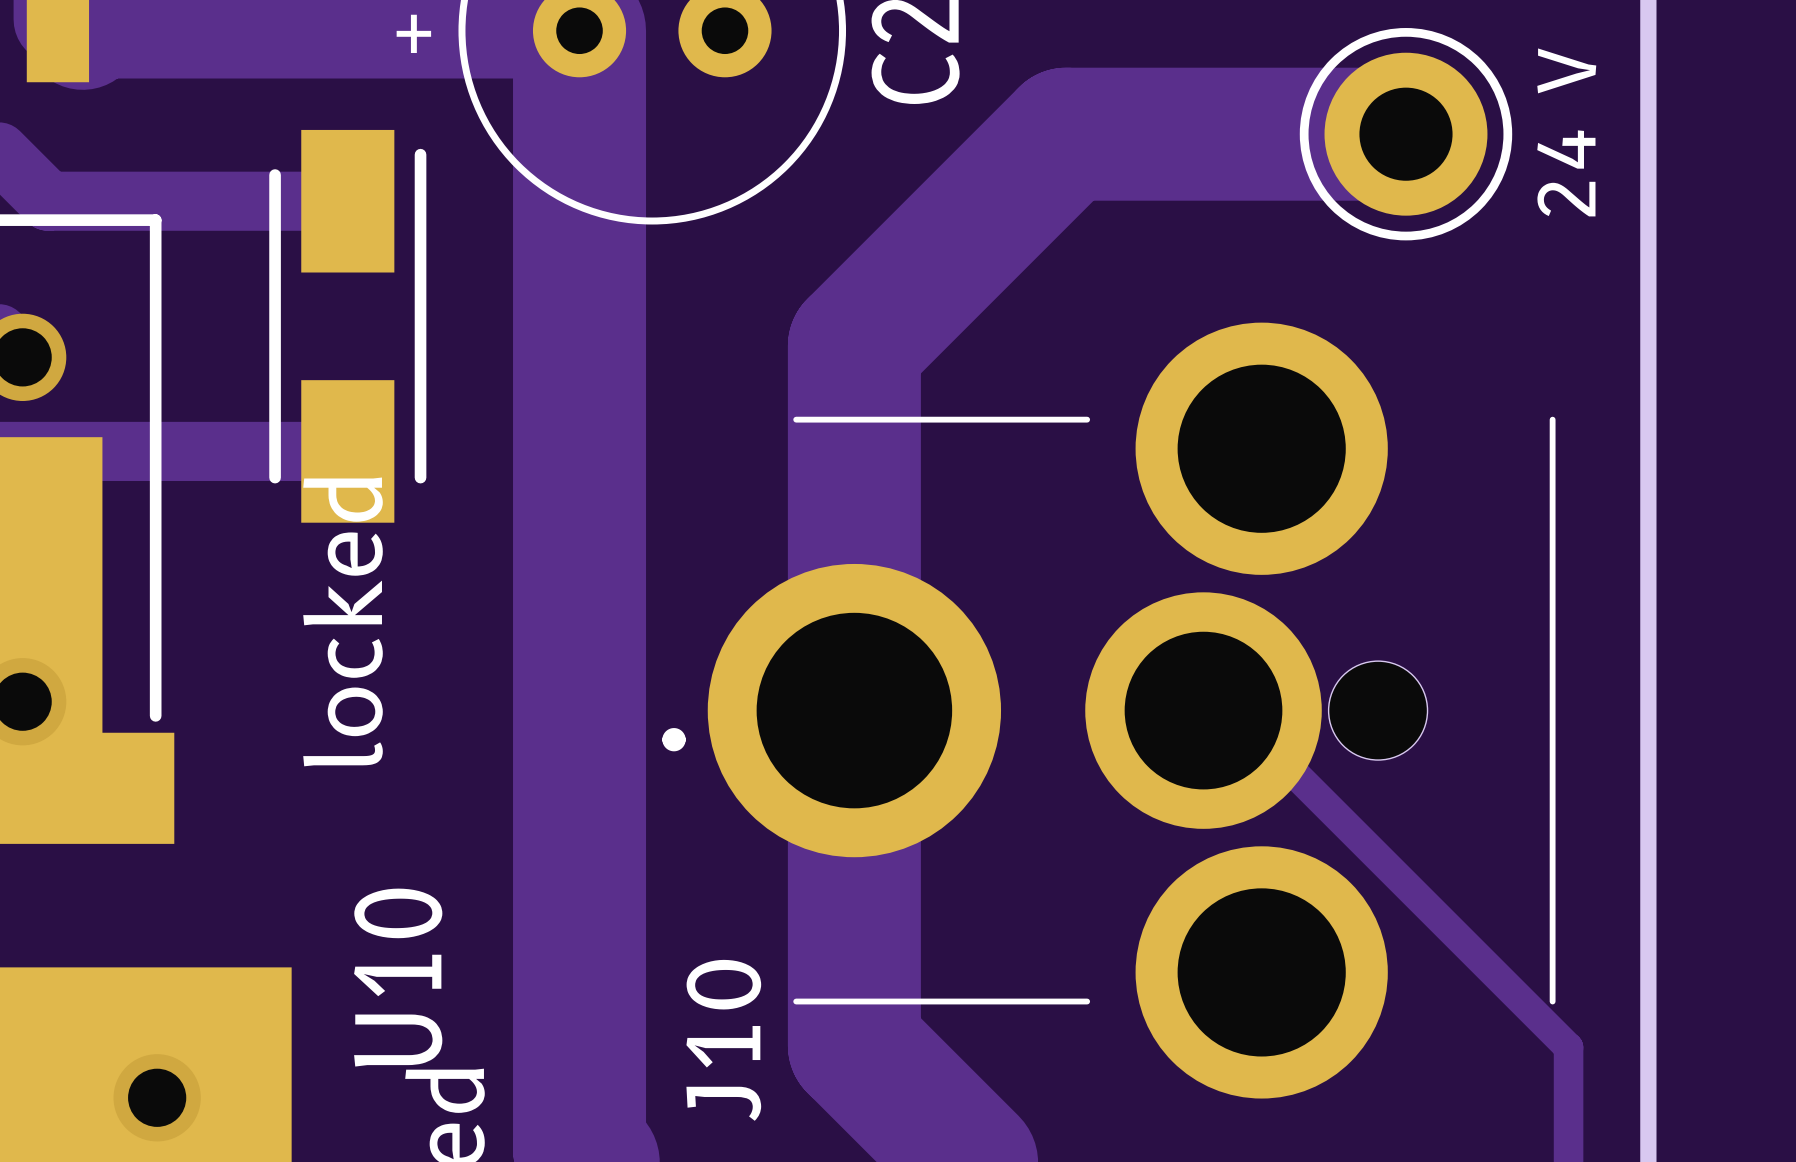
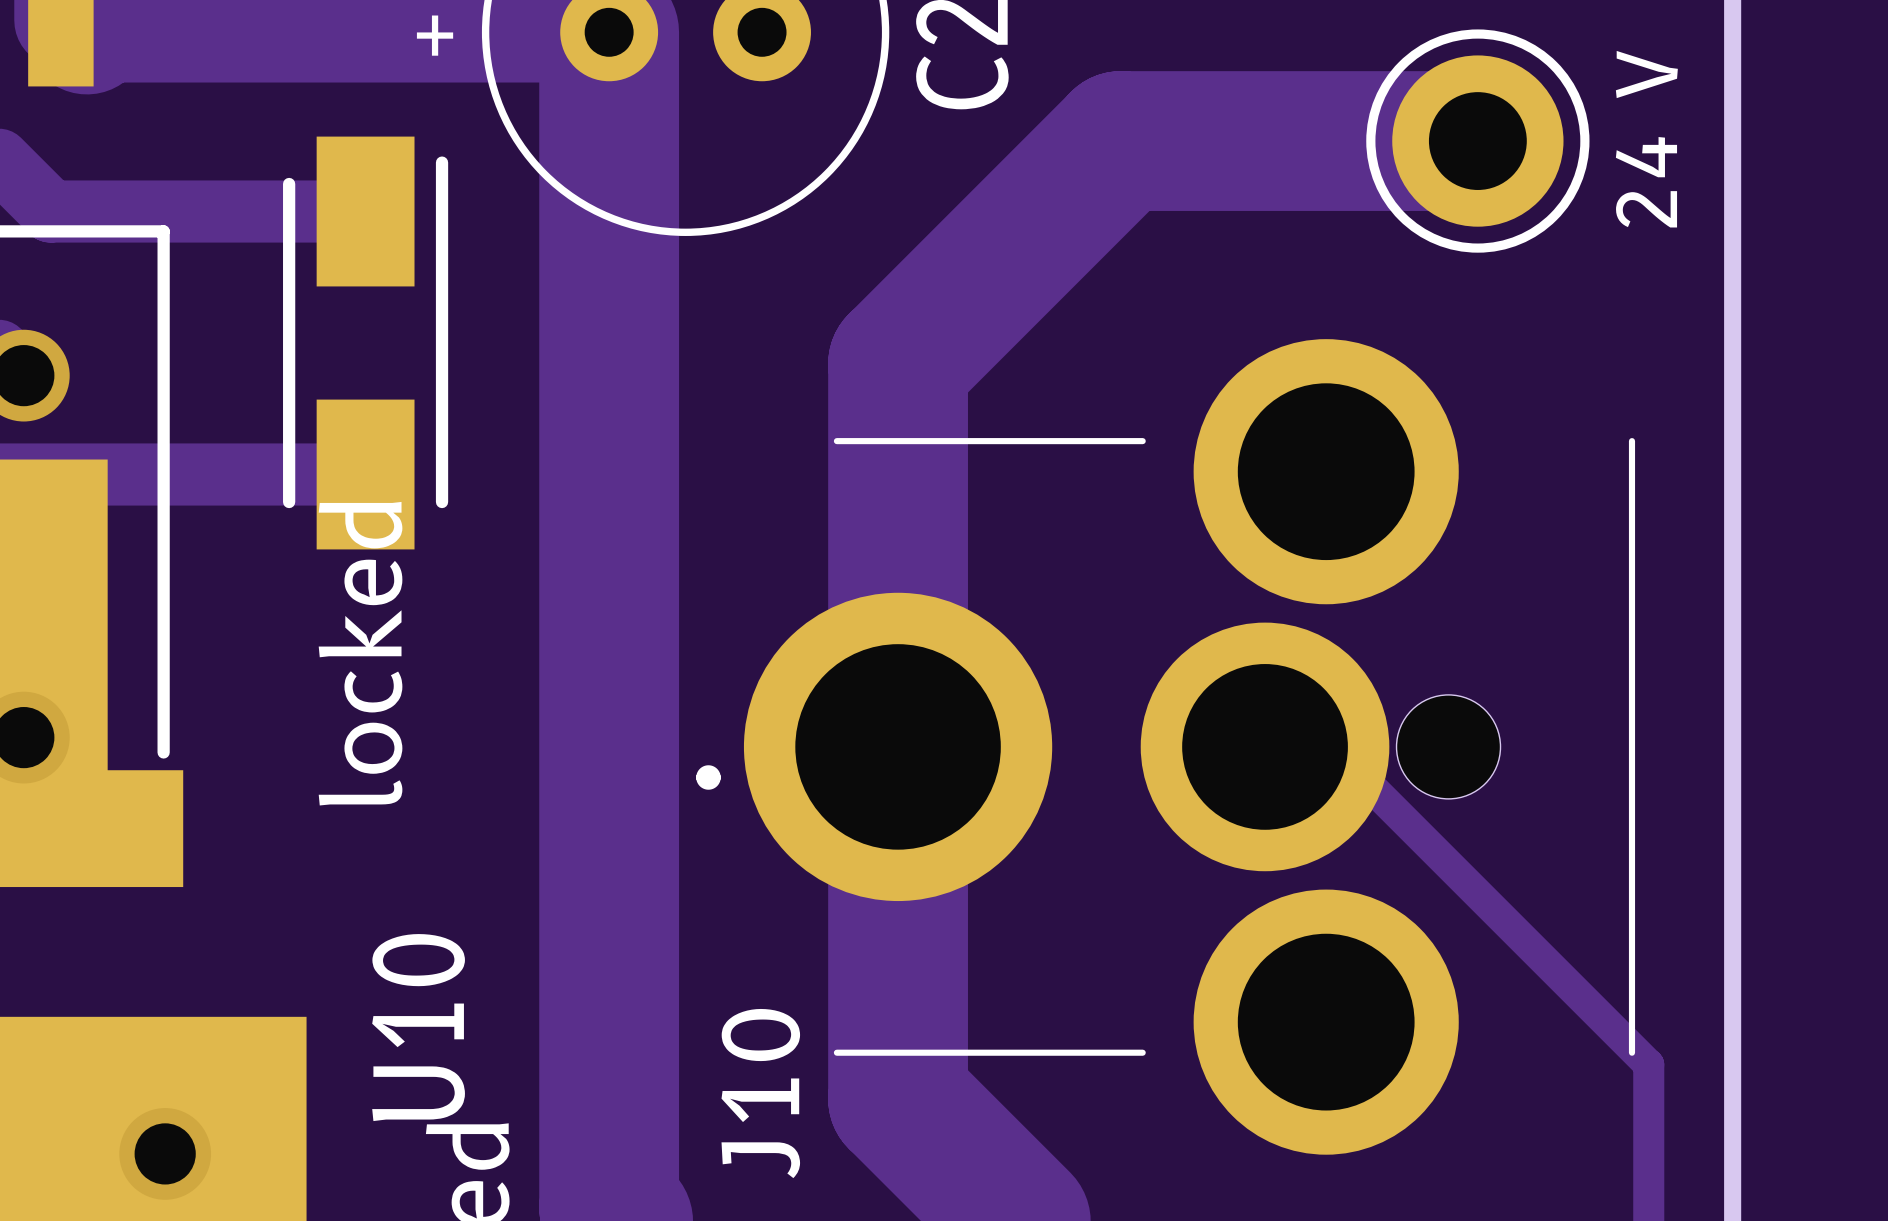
track: (1231, 710) (1568, 1047) -> (1294, 746) (1342, 746) (1342, 758) (1648, 1064) (1648, 1100)

